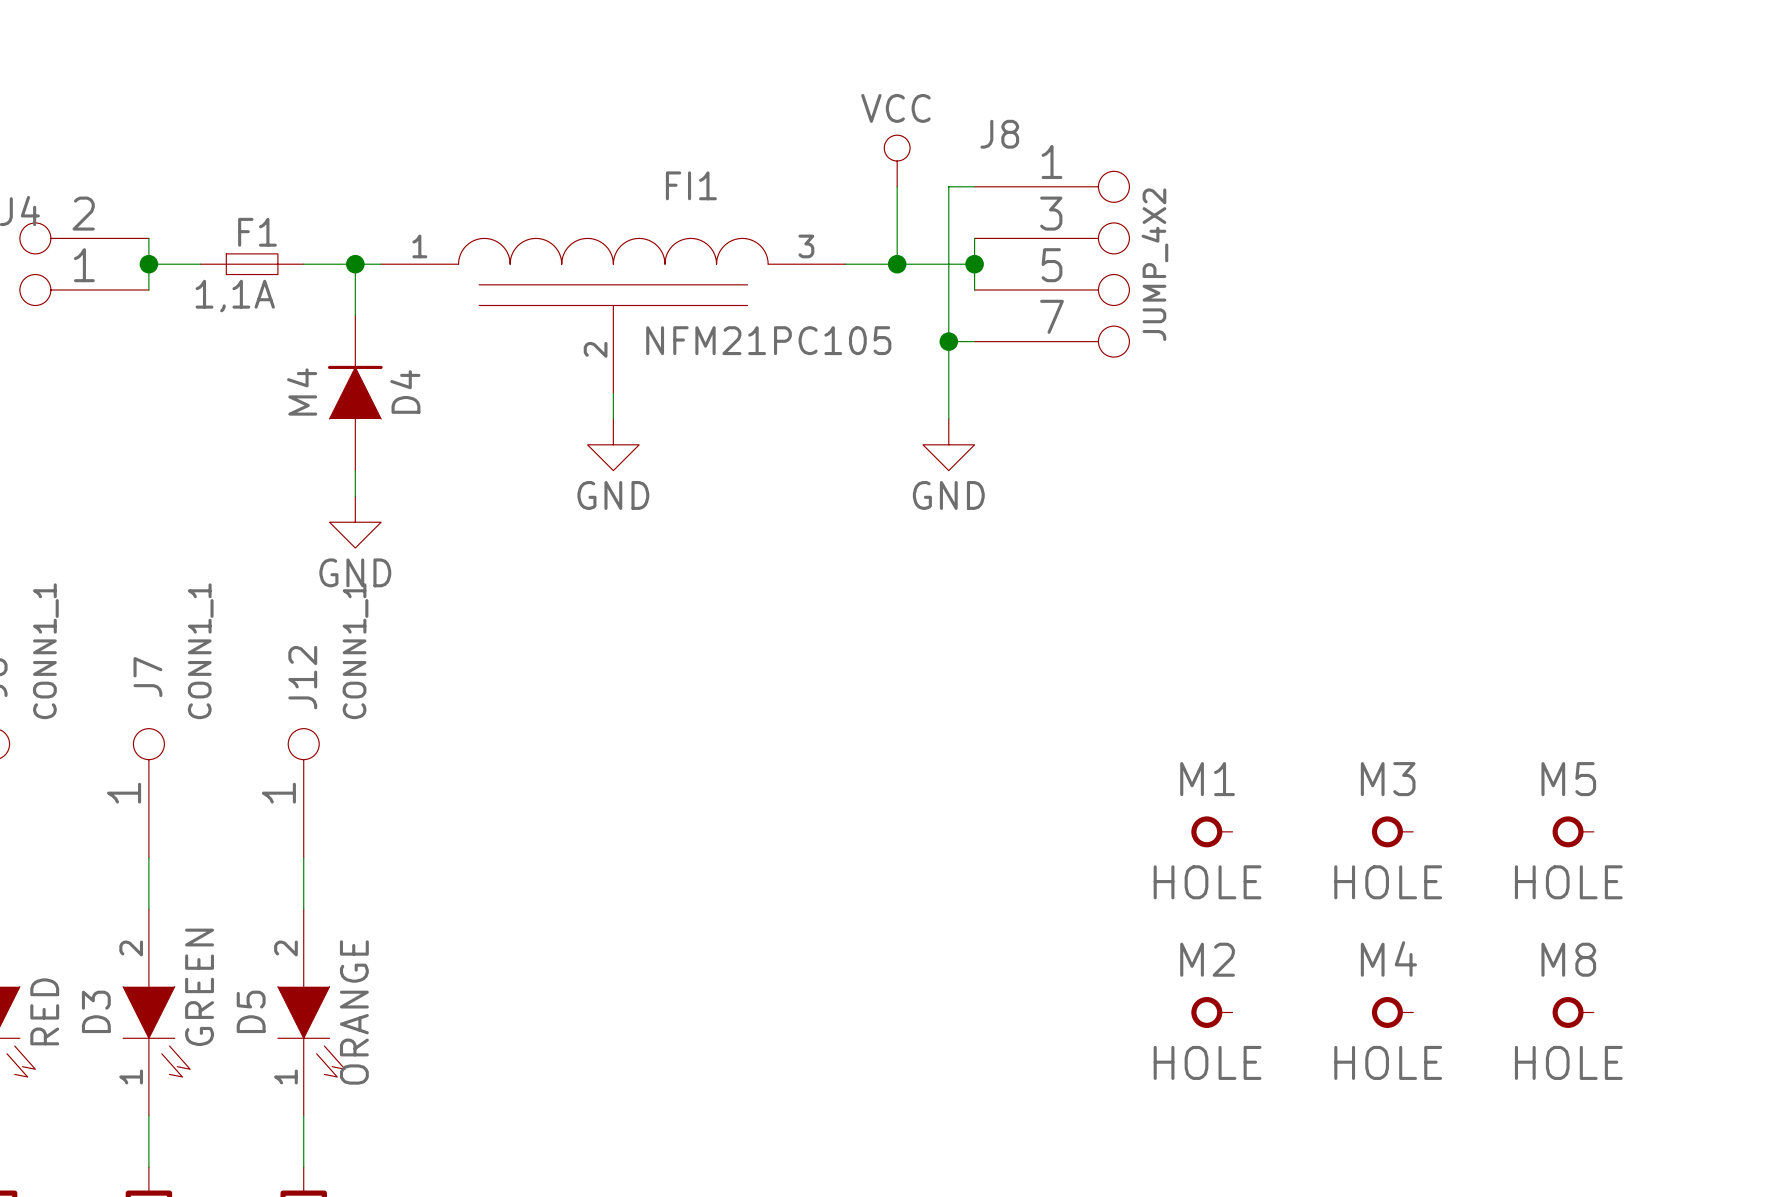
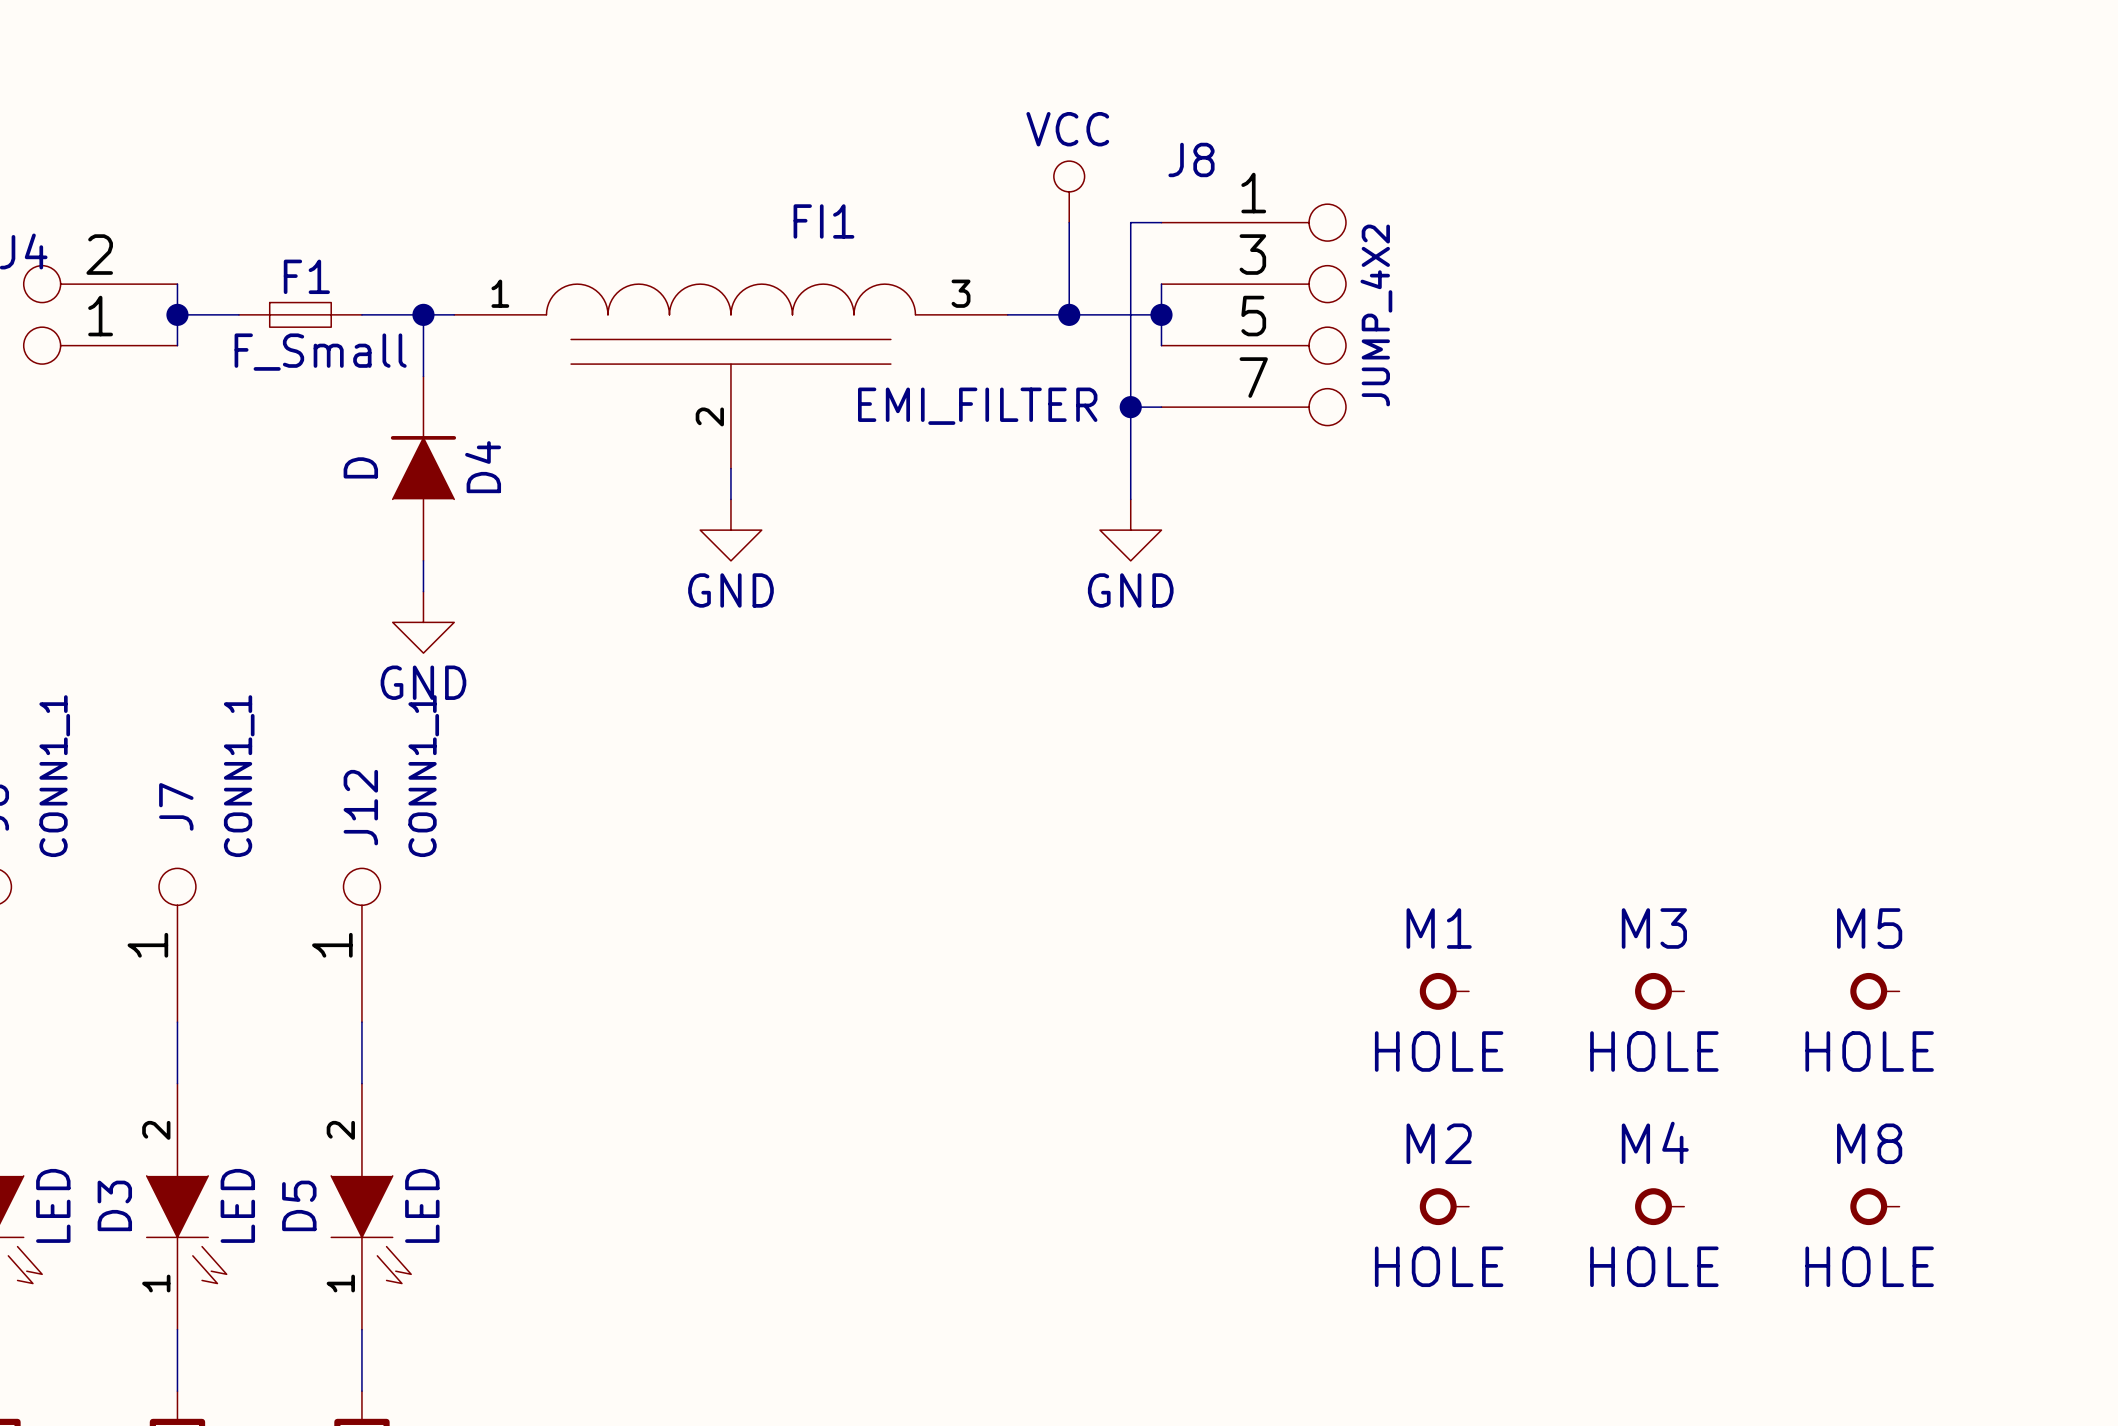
F1 value: 1,1A (235, 296) -> F_Small (320, 352)
FI1 value: NFM21PC105 (768, 340) -> EMI_FILTER (977, 406)
D4 value: M4 (302, 391) -> D (360, 467)
D3 value: GREEN (199, 987) -> LED (237, 1205)
part value: RED (44, 1011) -> LED (53, 1205)
D5 value: ORANGE (354, 1012) -> LED (422, 1205)

